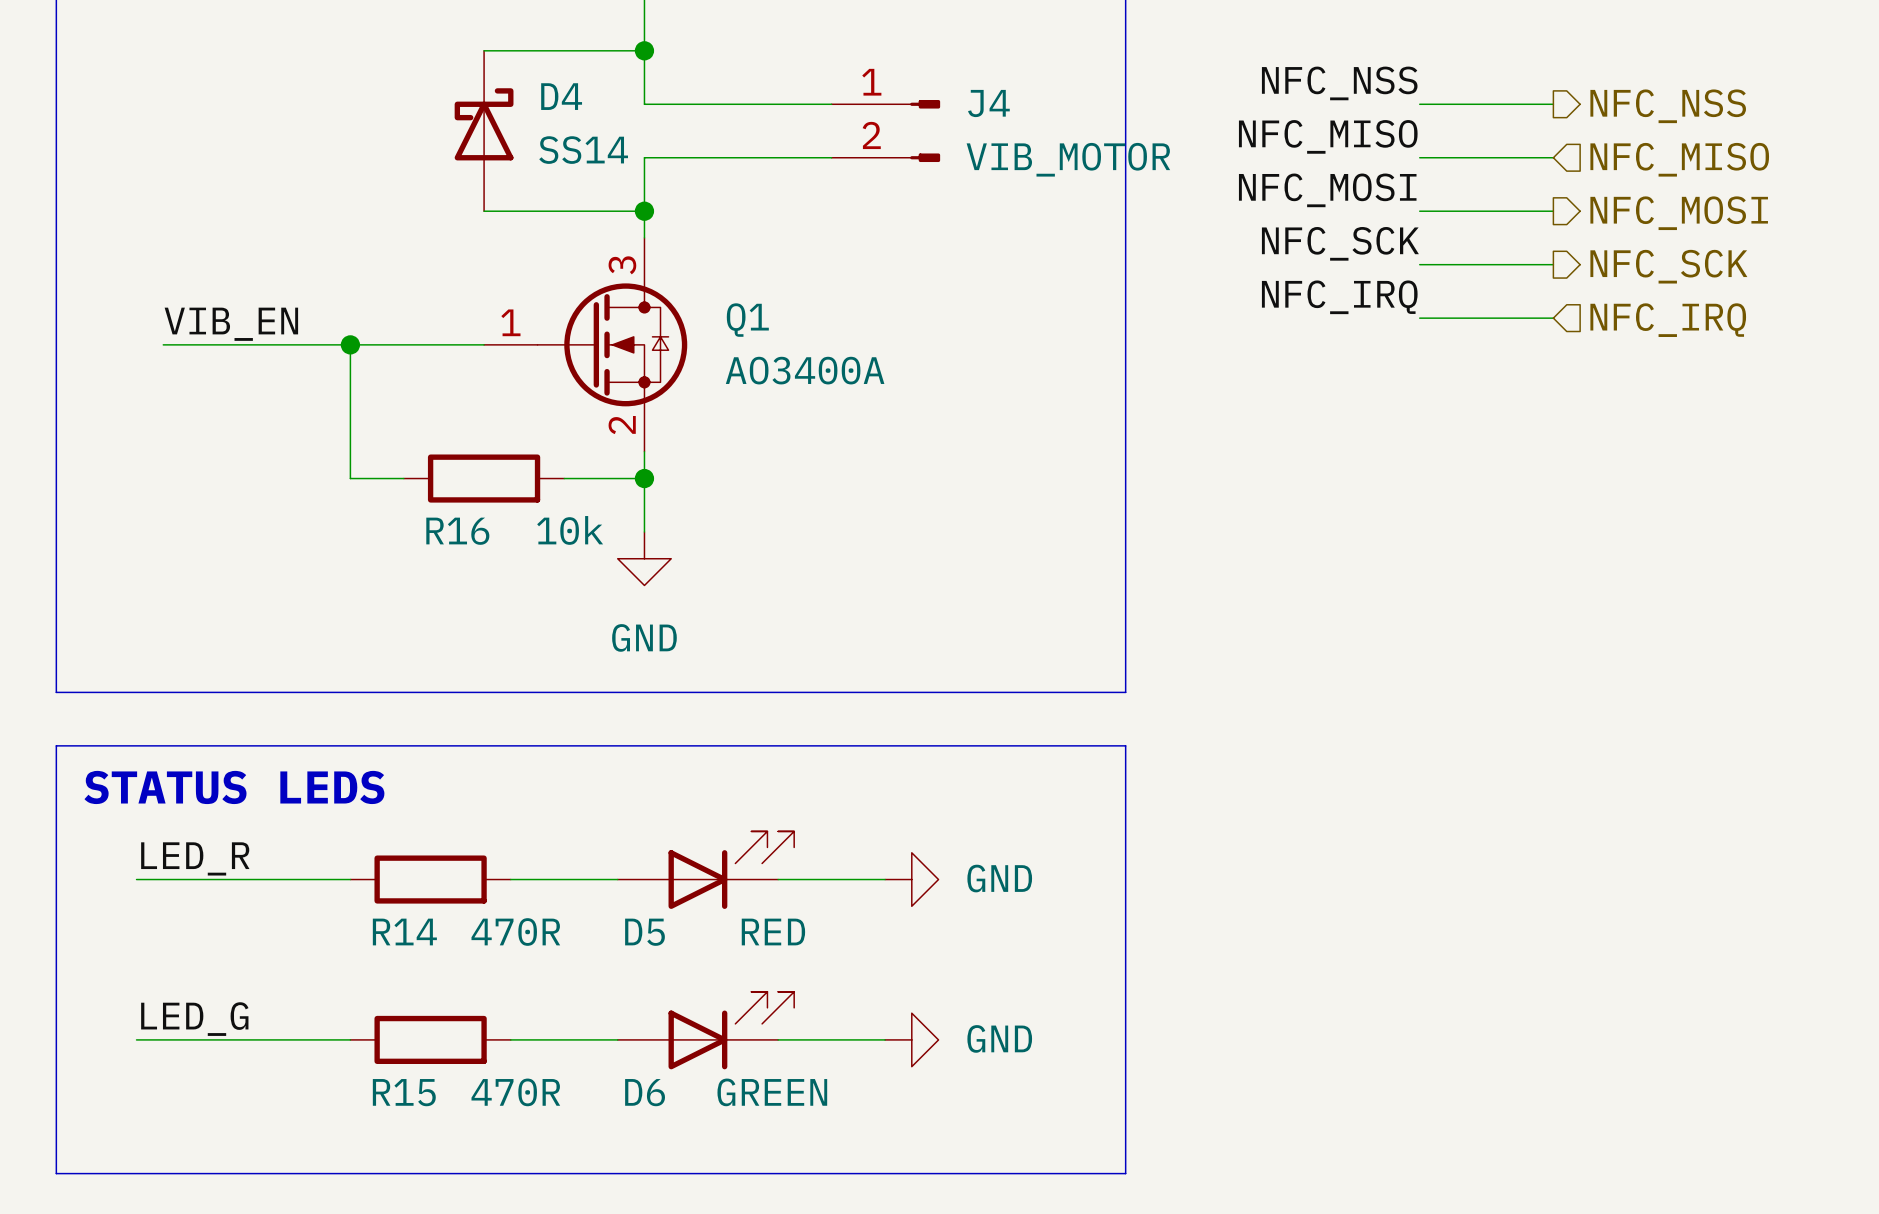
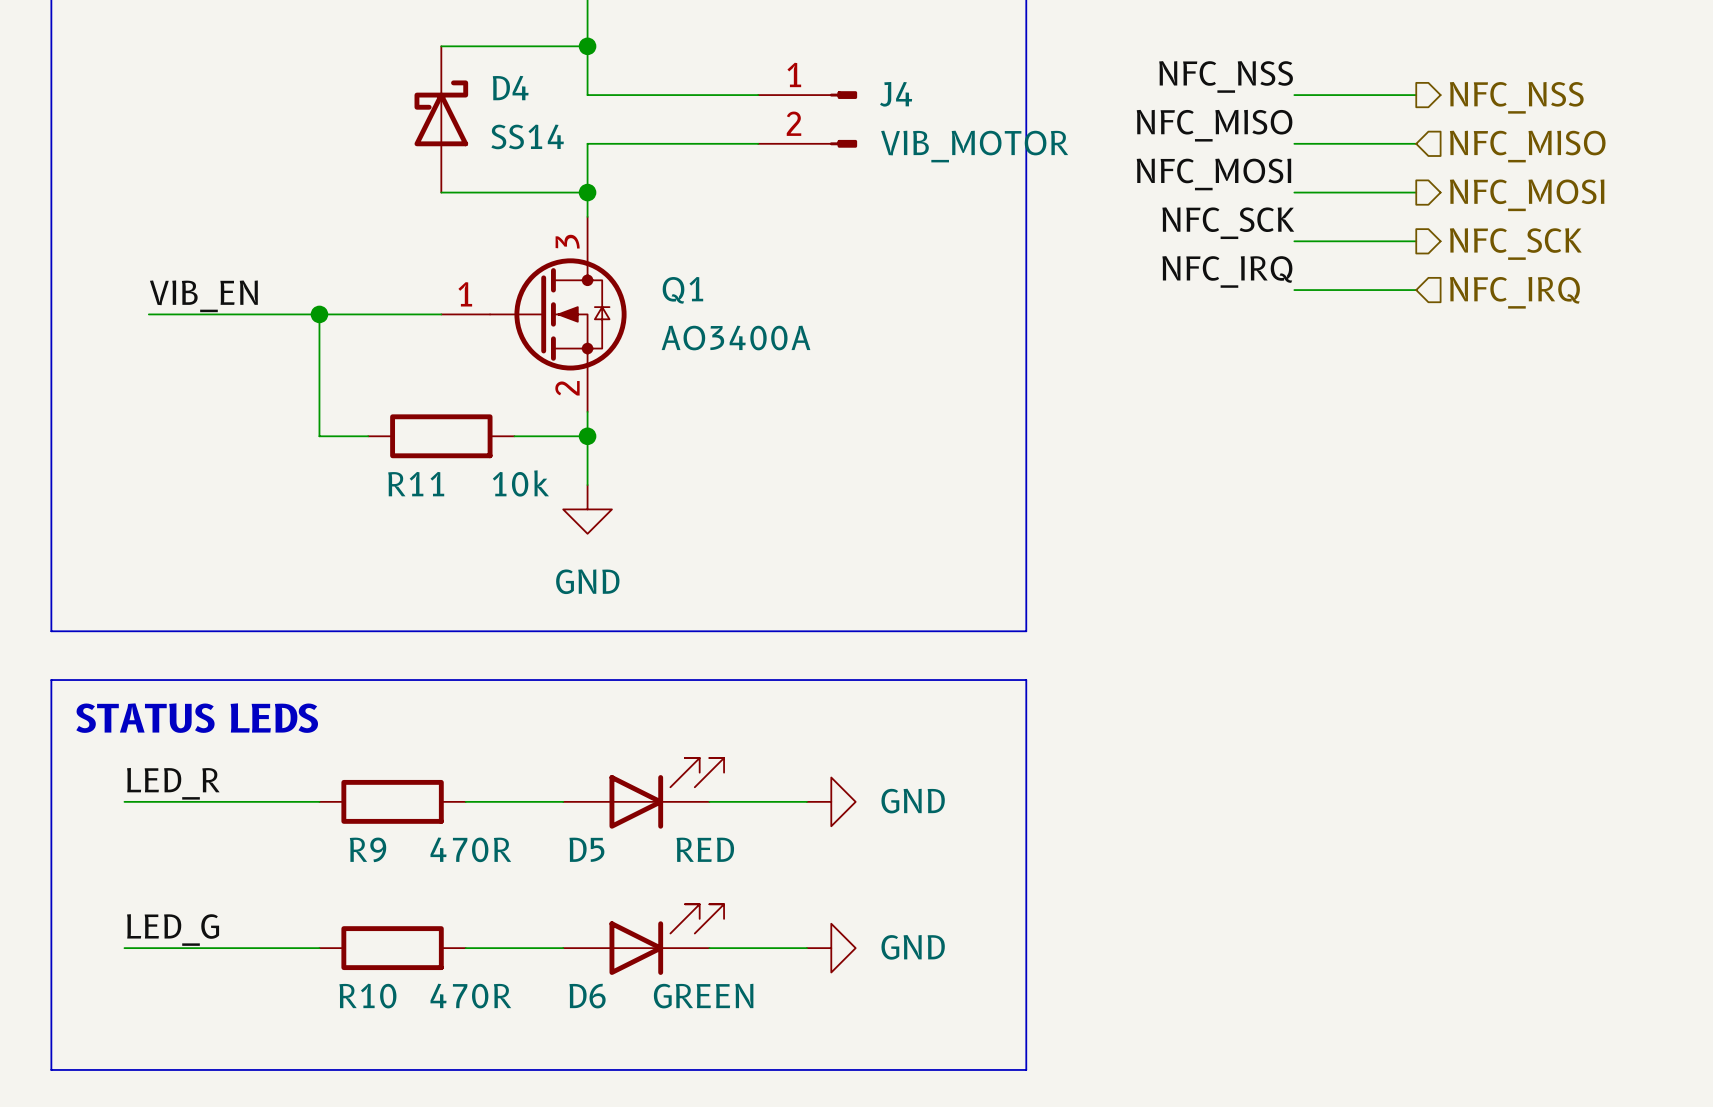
R16 name: R16 (457, 531) -> R11 (416, 484)
R14 name: R14 (404, 932) -> R9 (368, 849)
R15 name: R15 (404, 1092) -> R10 (367, 996)

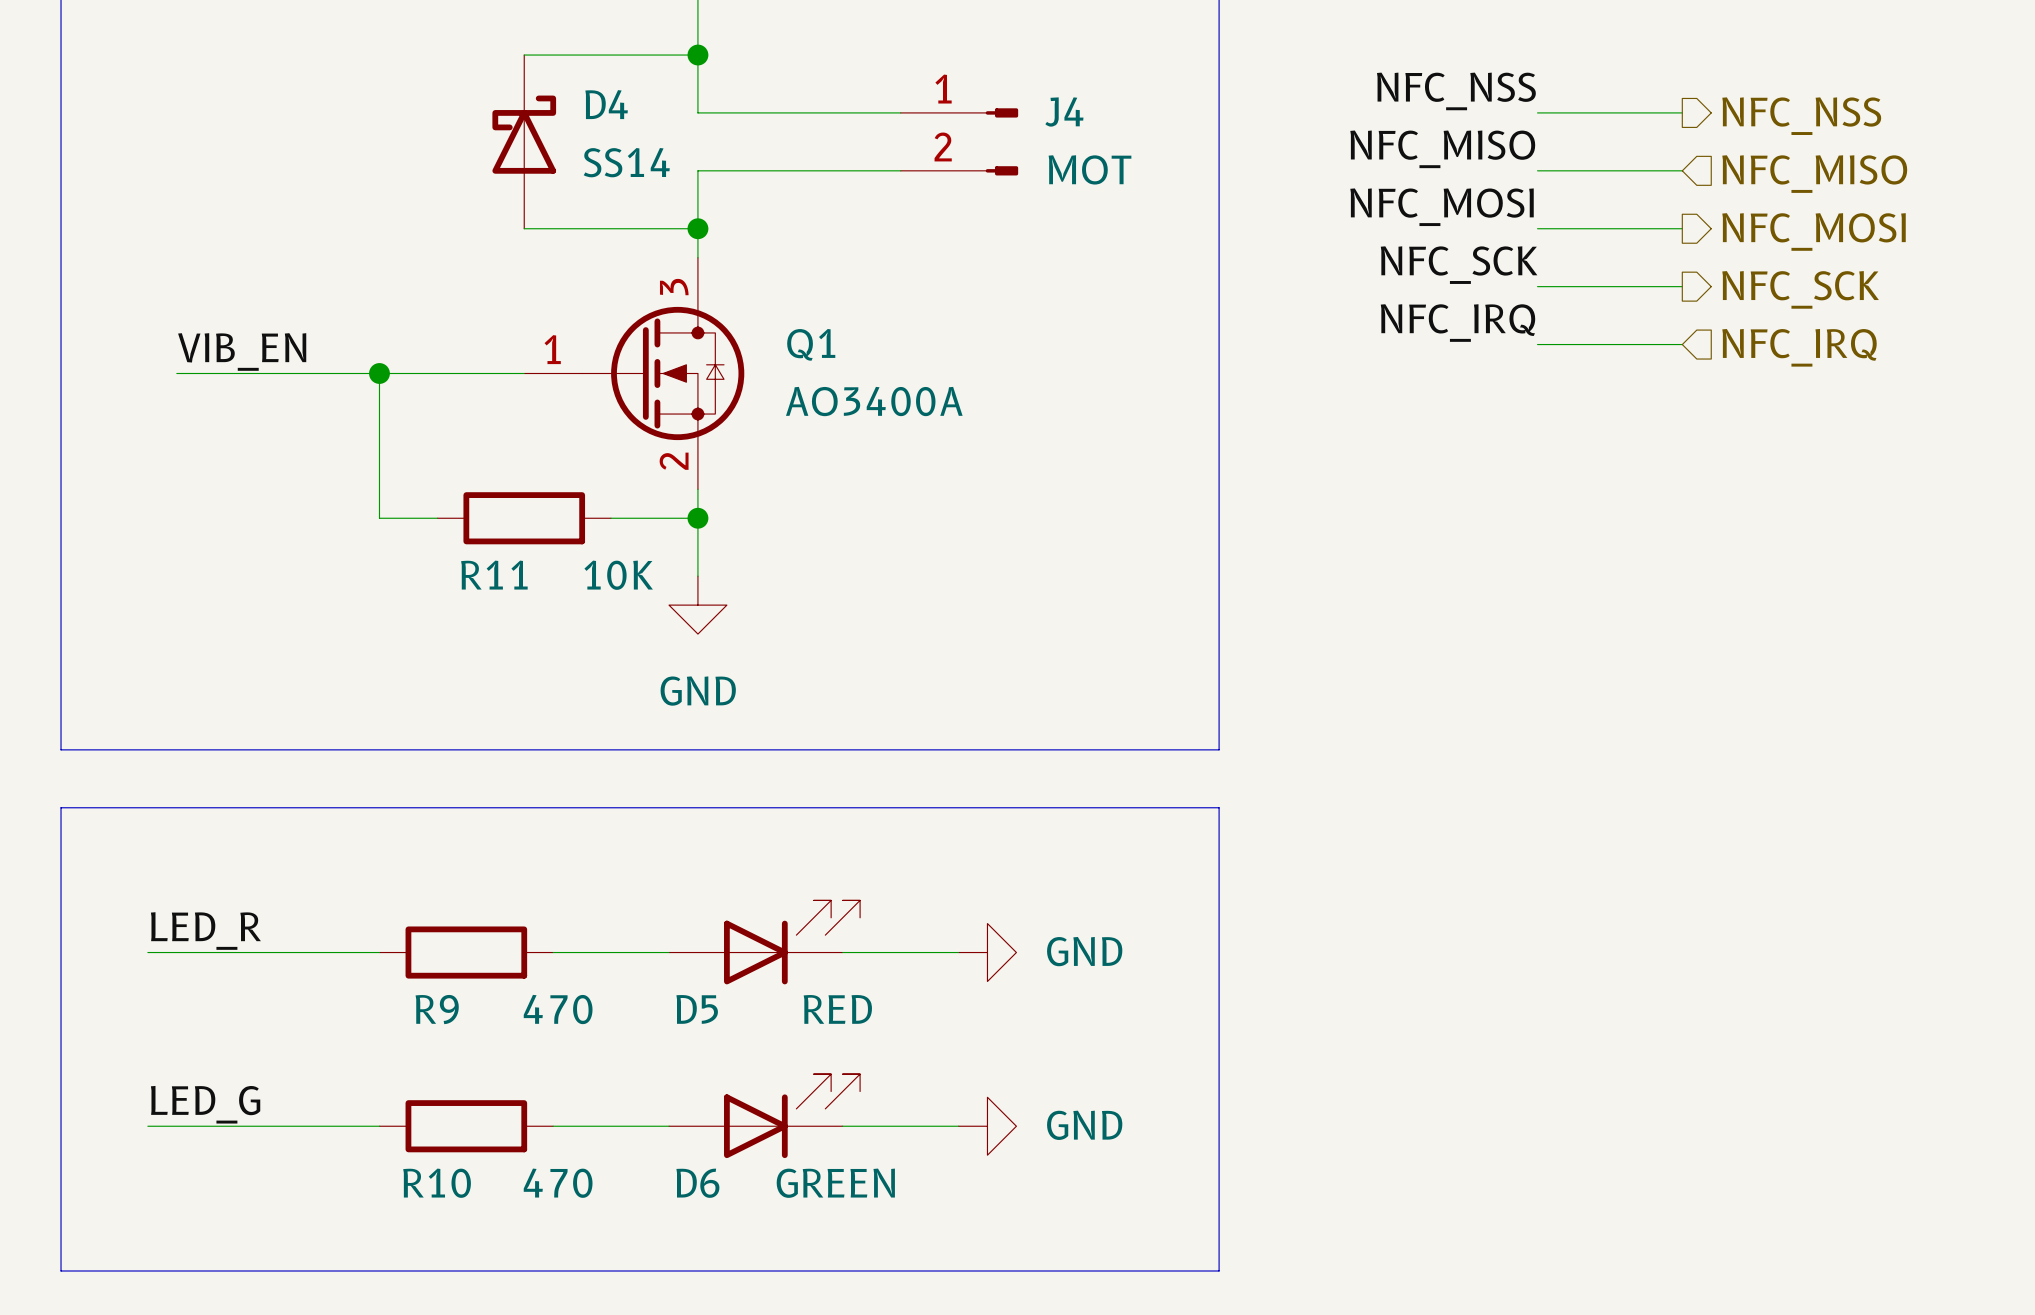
J4 value: VIB_MOTOR (974, 146) -> MOT (1090, 169)
R11 value: 10k (520, 483) -> 10K (618, 575)
text: STATUS LEDS (197, 718) -> none
R9 value: 470R (470, 849) -> 470 (558, 1009)
R10 value: 470R (470, 996) -> 470 (558, 1183)

